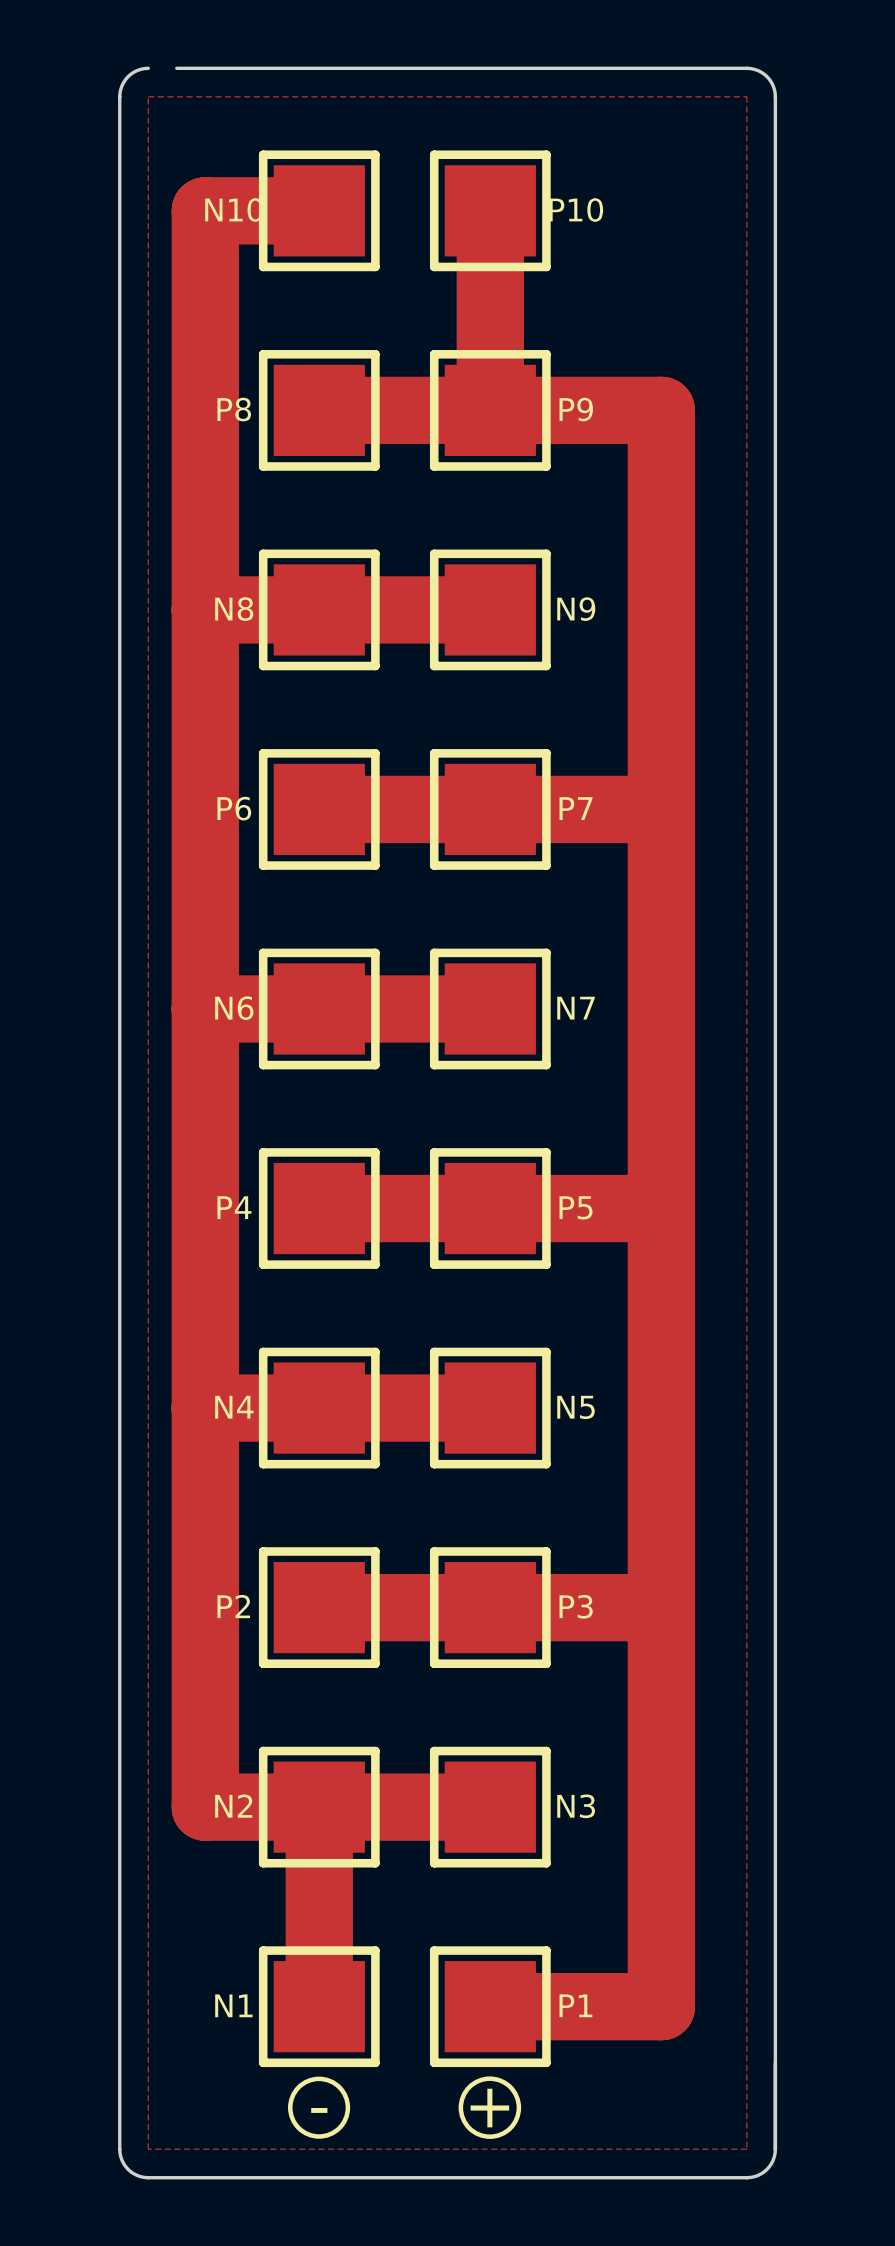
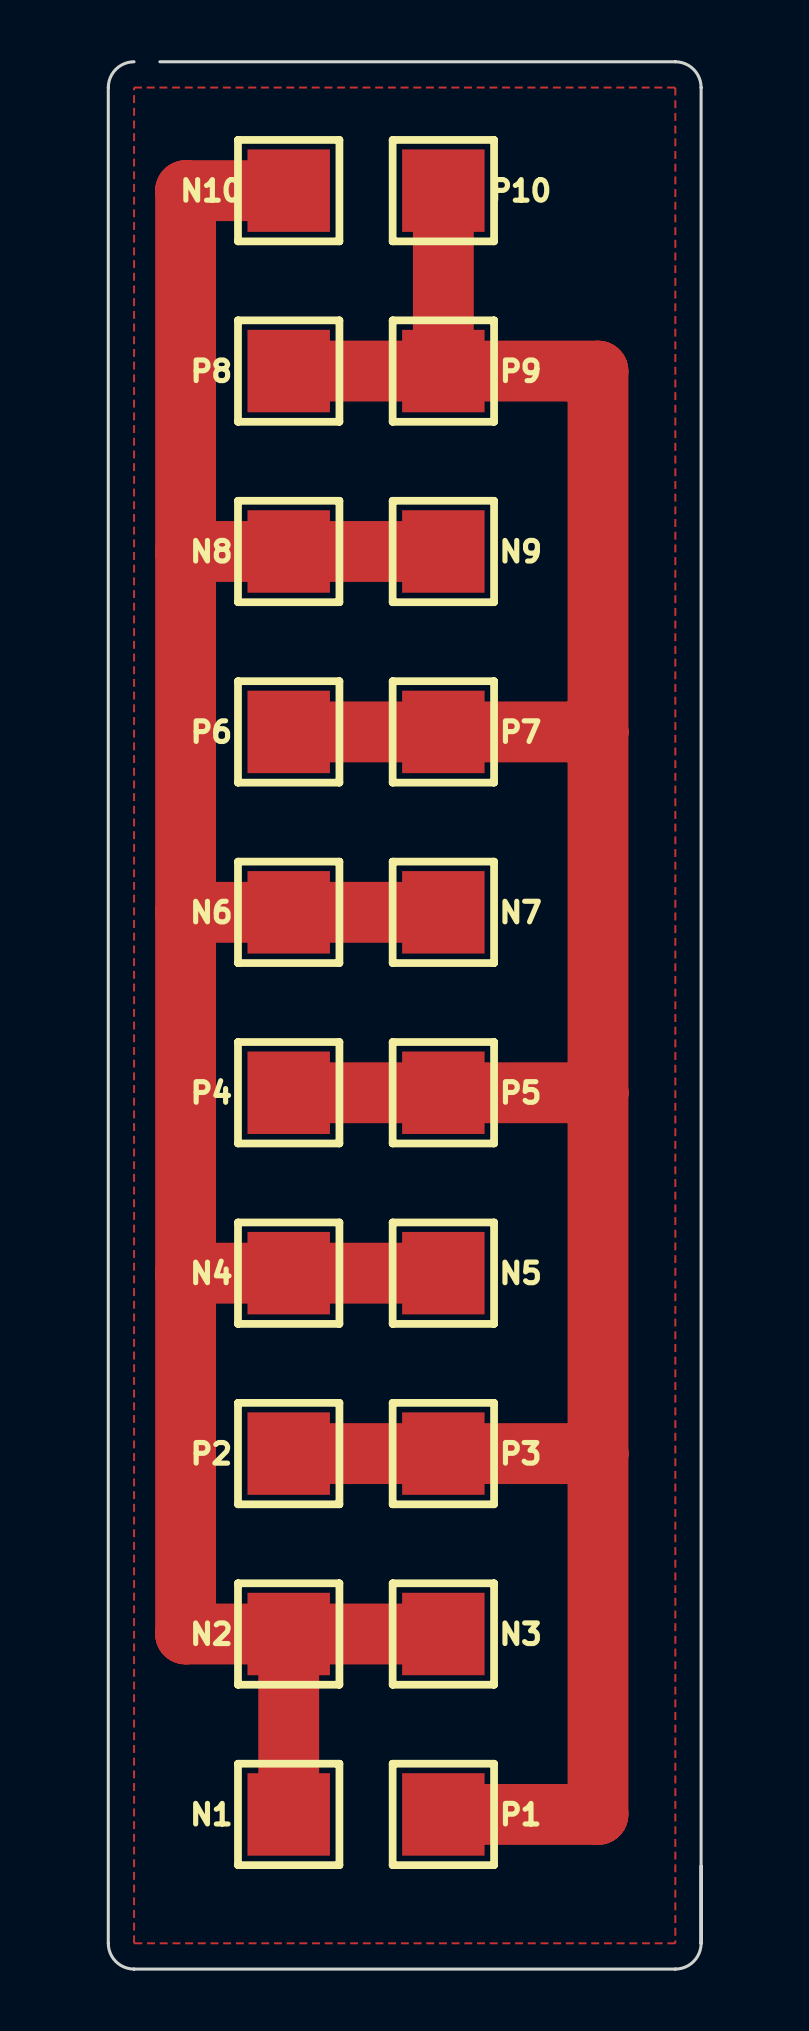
drawing: [288, 2076, 351, 2139] -> none
drawing: [458, 2076, 522, 2139] -> none
text: + (489, 2108) -> none
text: - (319, 2110) -> none

